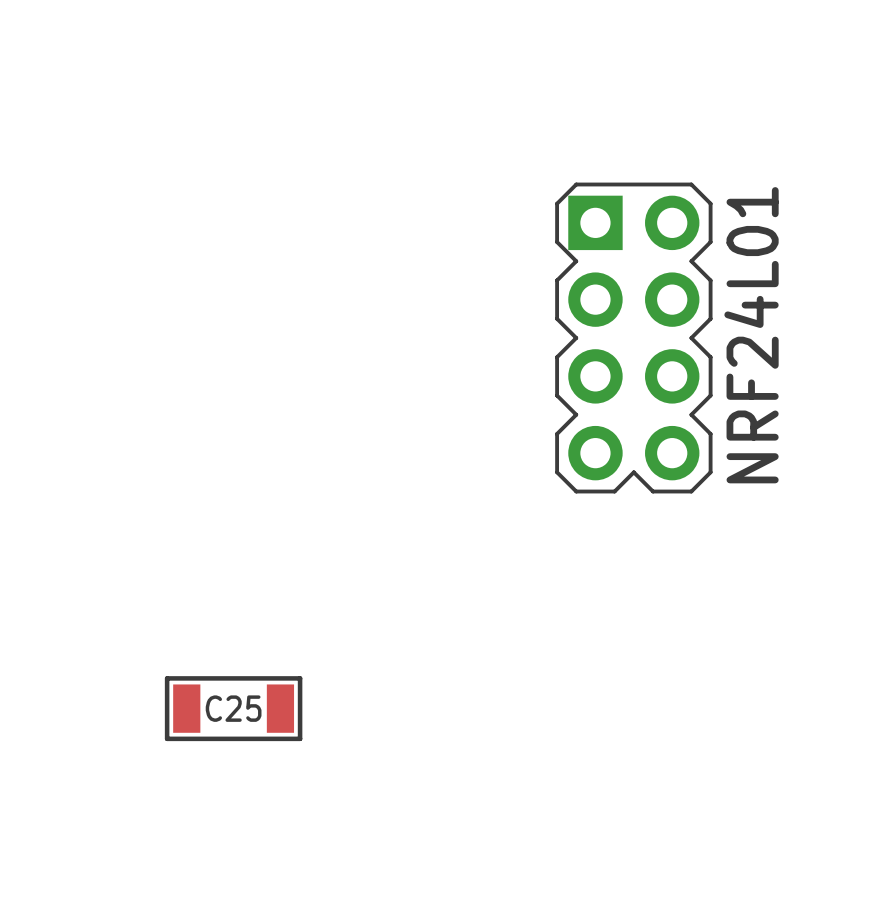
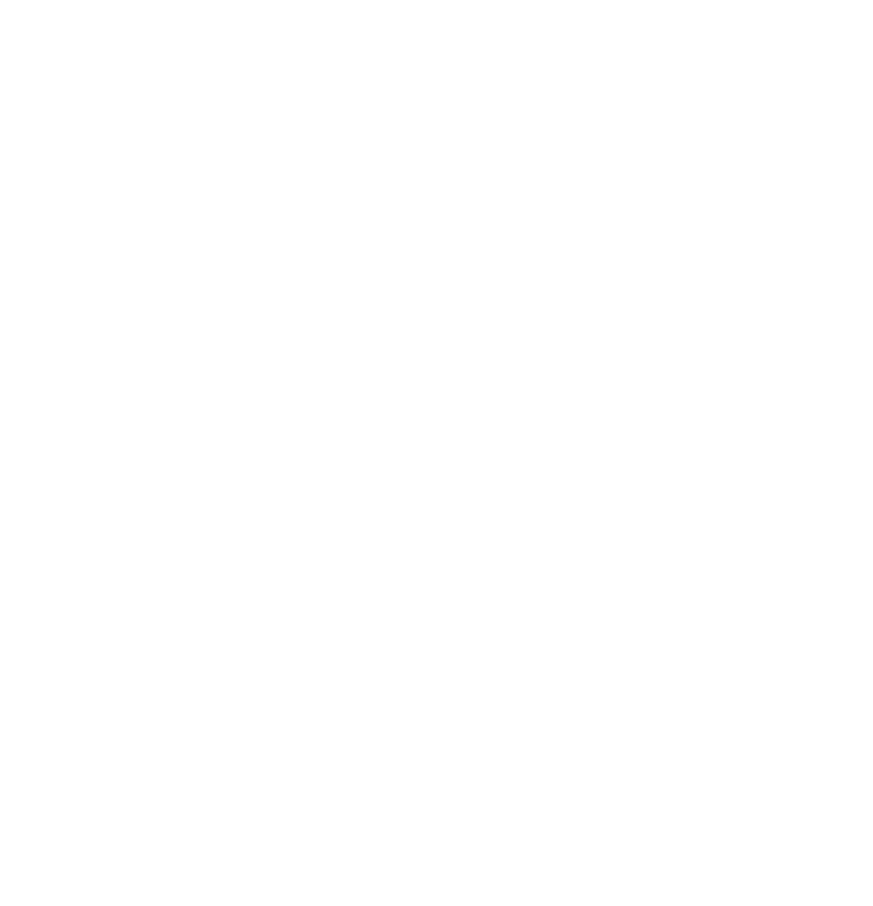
NRF24L01: (633, 338) -> none
C25: (233, 708) -> none

